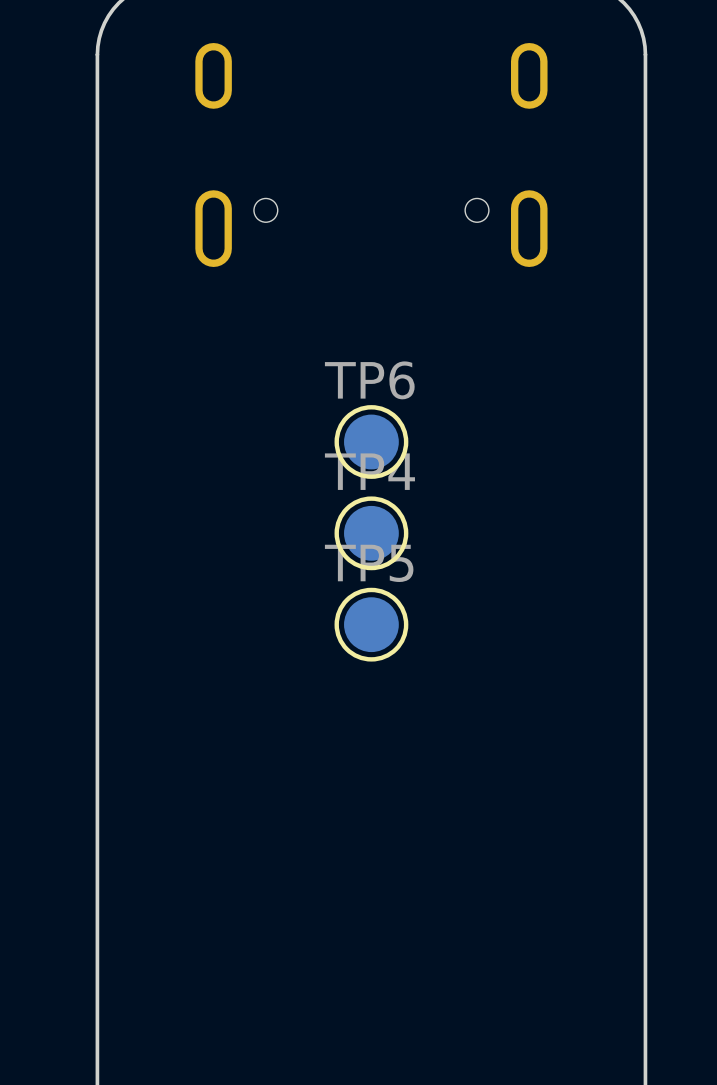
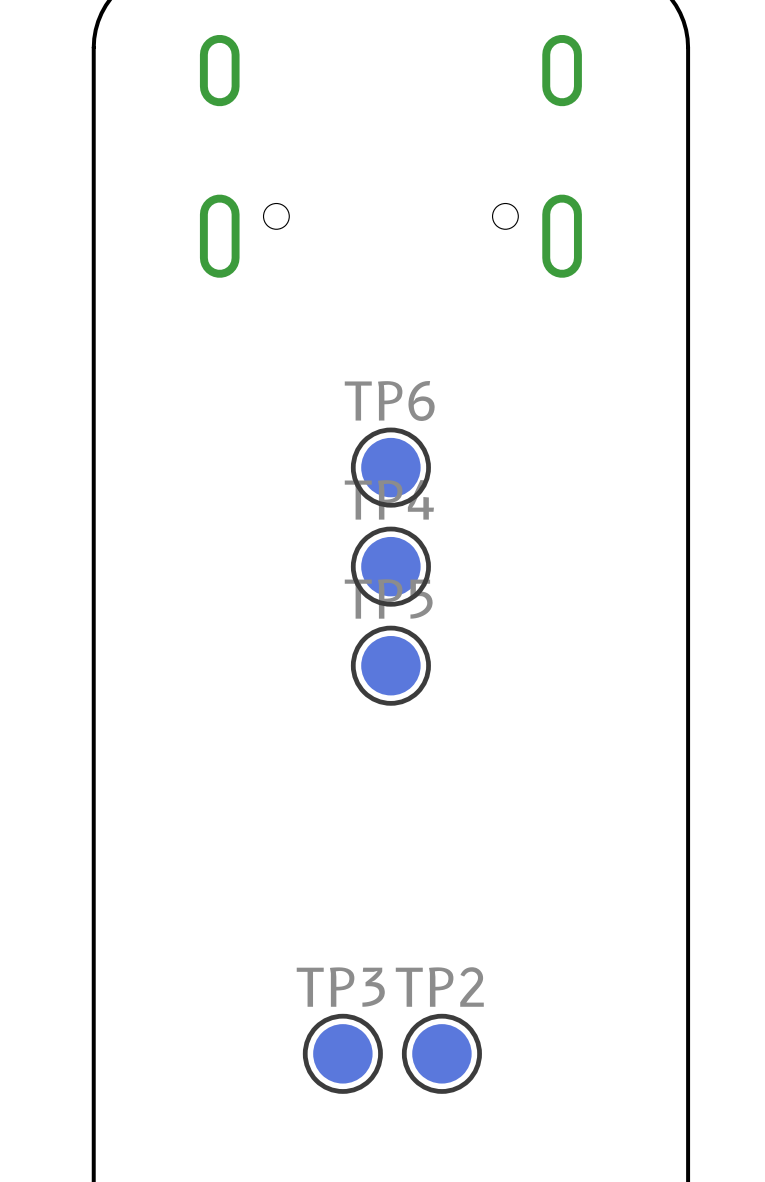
TP3: none -> (342, 1053)
TP2: none -> (441, 1053)

